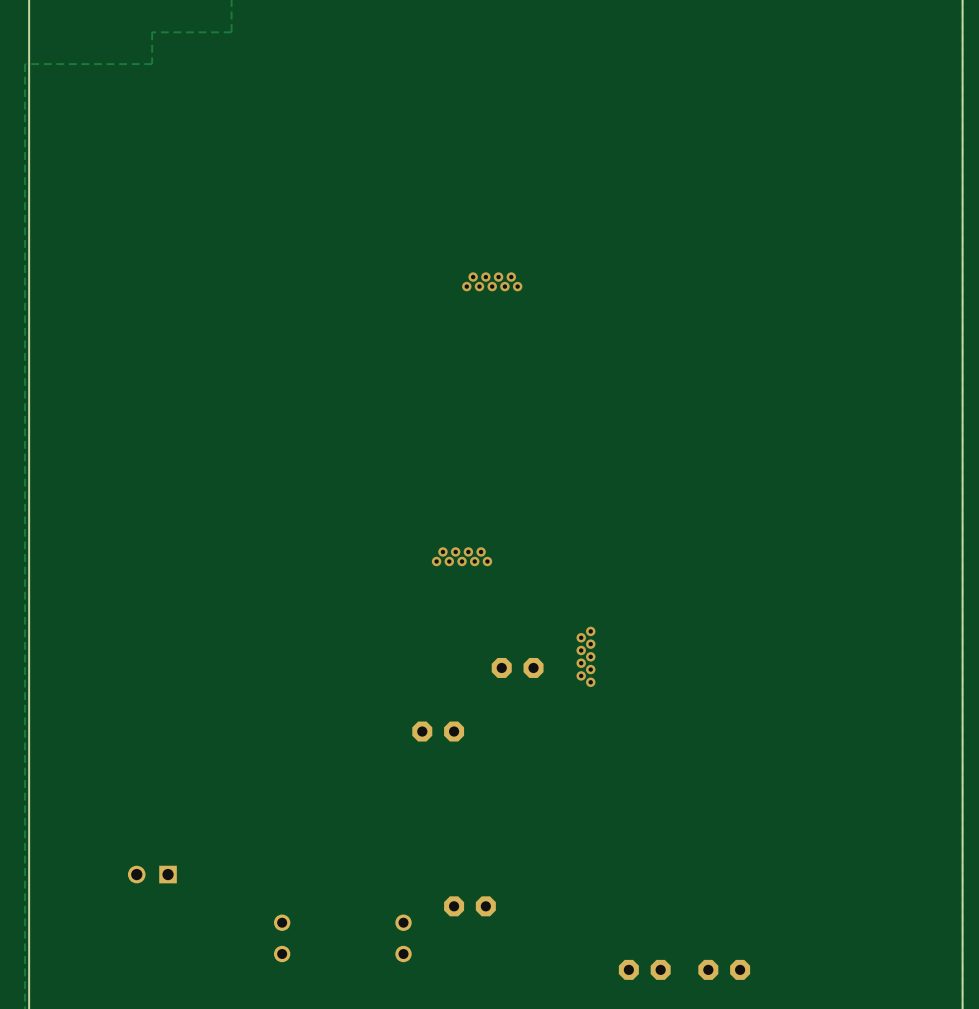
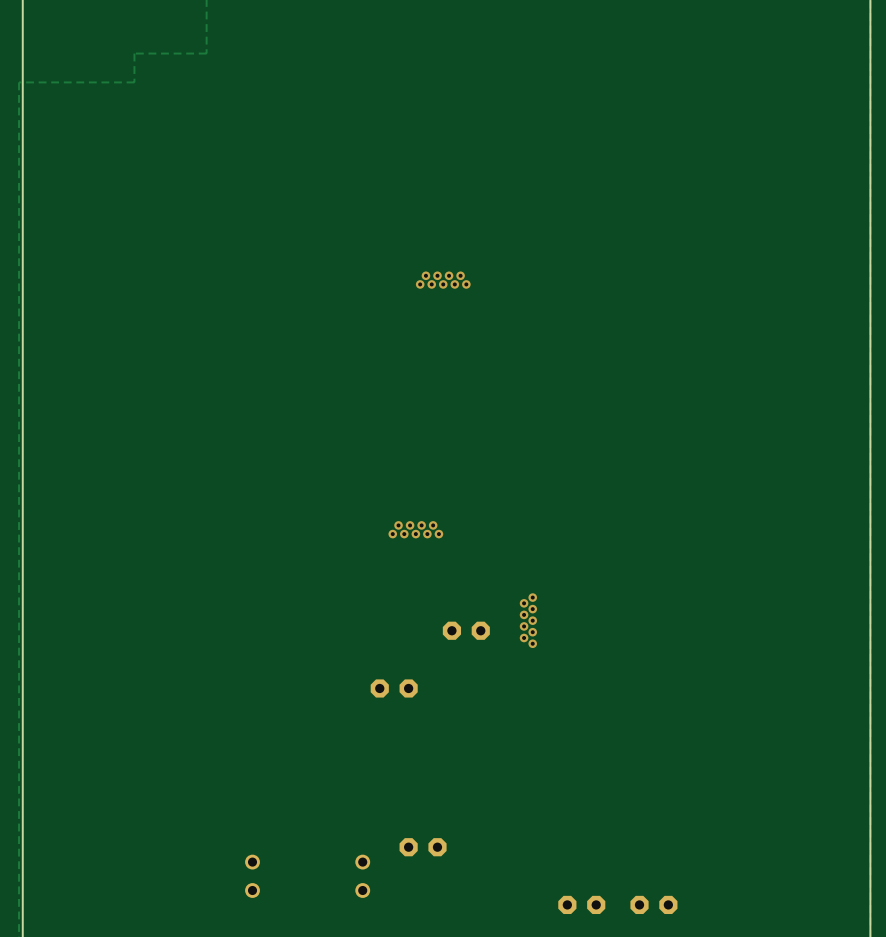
part: (152, 874) -> none

